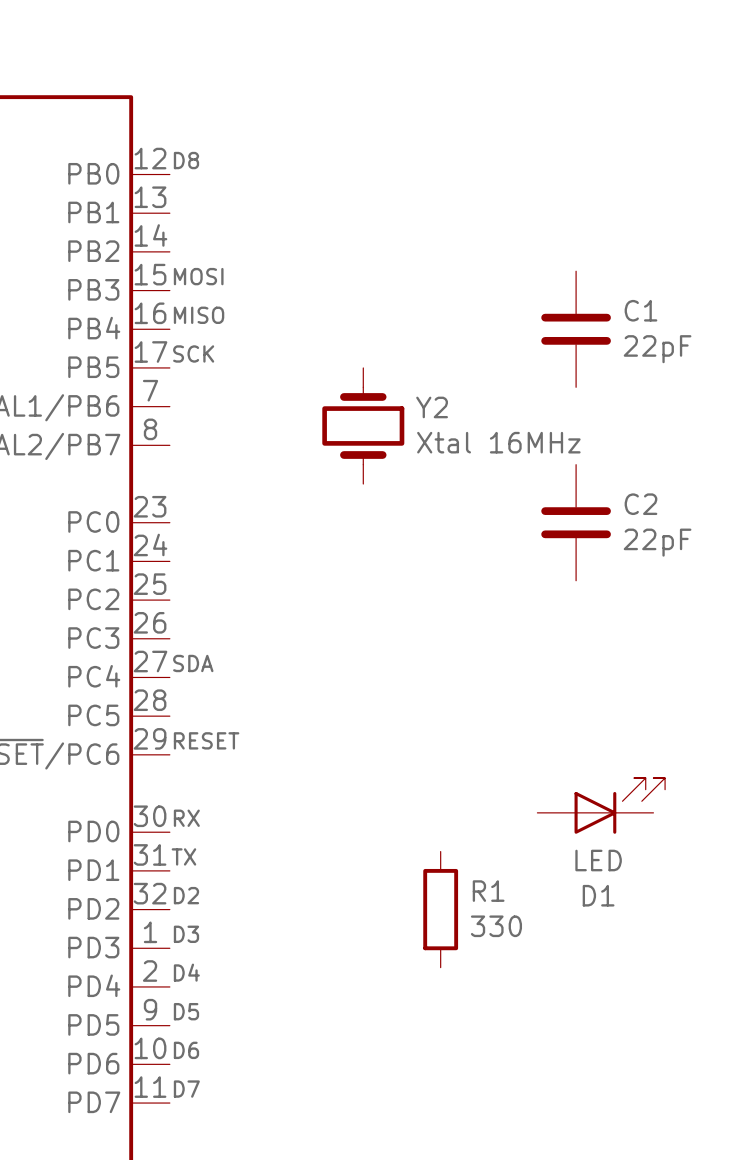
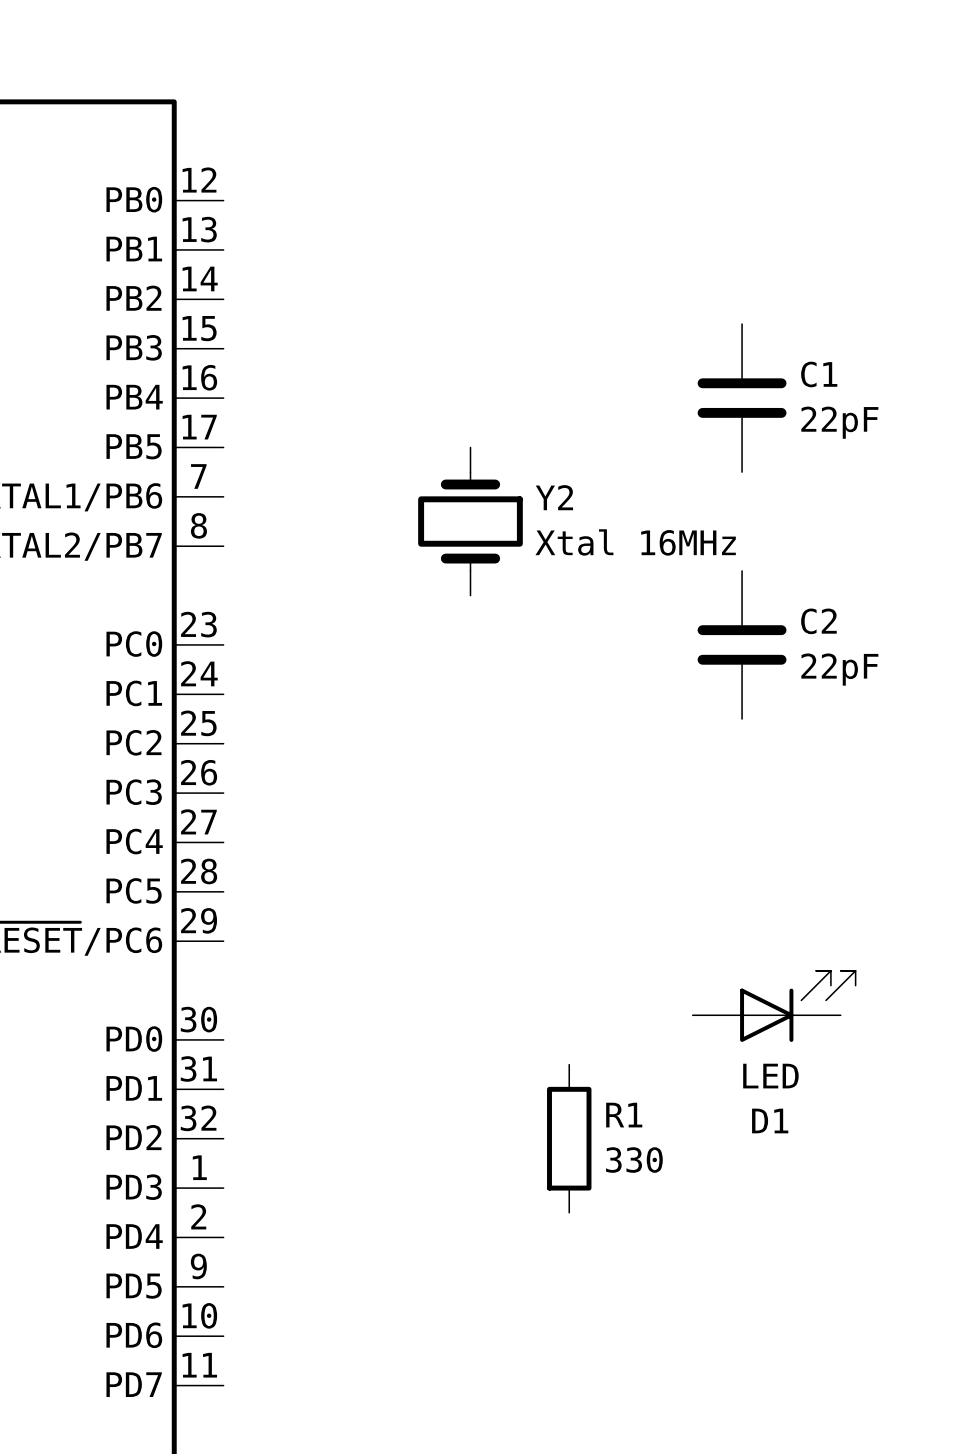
label: D8 (186, 160) -> none
label: MOSI (198, 276) -> none
label: MISO (199, 315) -> none
label: SCK (193, 353) -> none
label: SDA (193, 663) -> none
label: RESET (206, 740) -> none
label: RX (186, 818) -> none
label: TX (183, 856) -> none
label: D2 (186, 895) -> none
label: D3 (186, 934) -> none
label: D4 (186, 972) -> none
label: D5 (186, 1011) -> none
label: D6 (186, 1050) -> none
label: D7 (186, 1089) -> none

